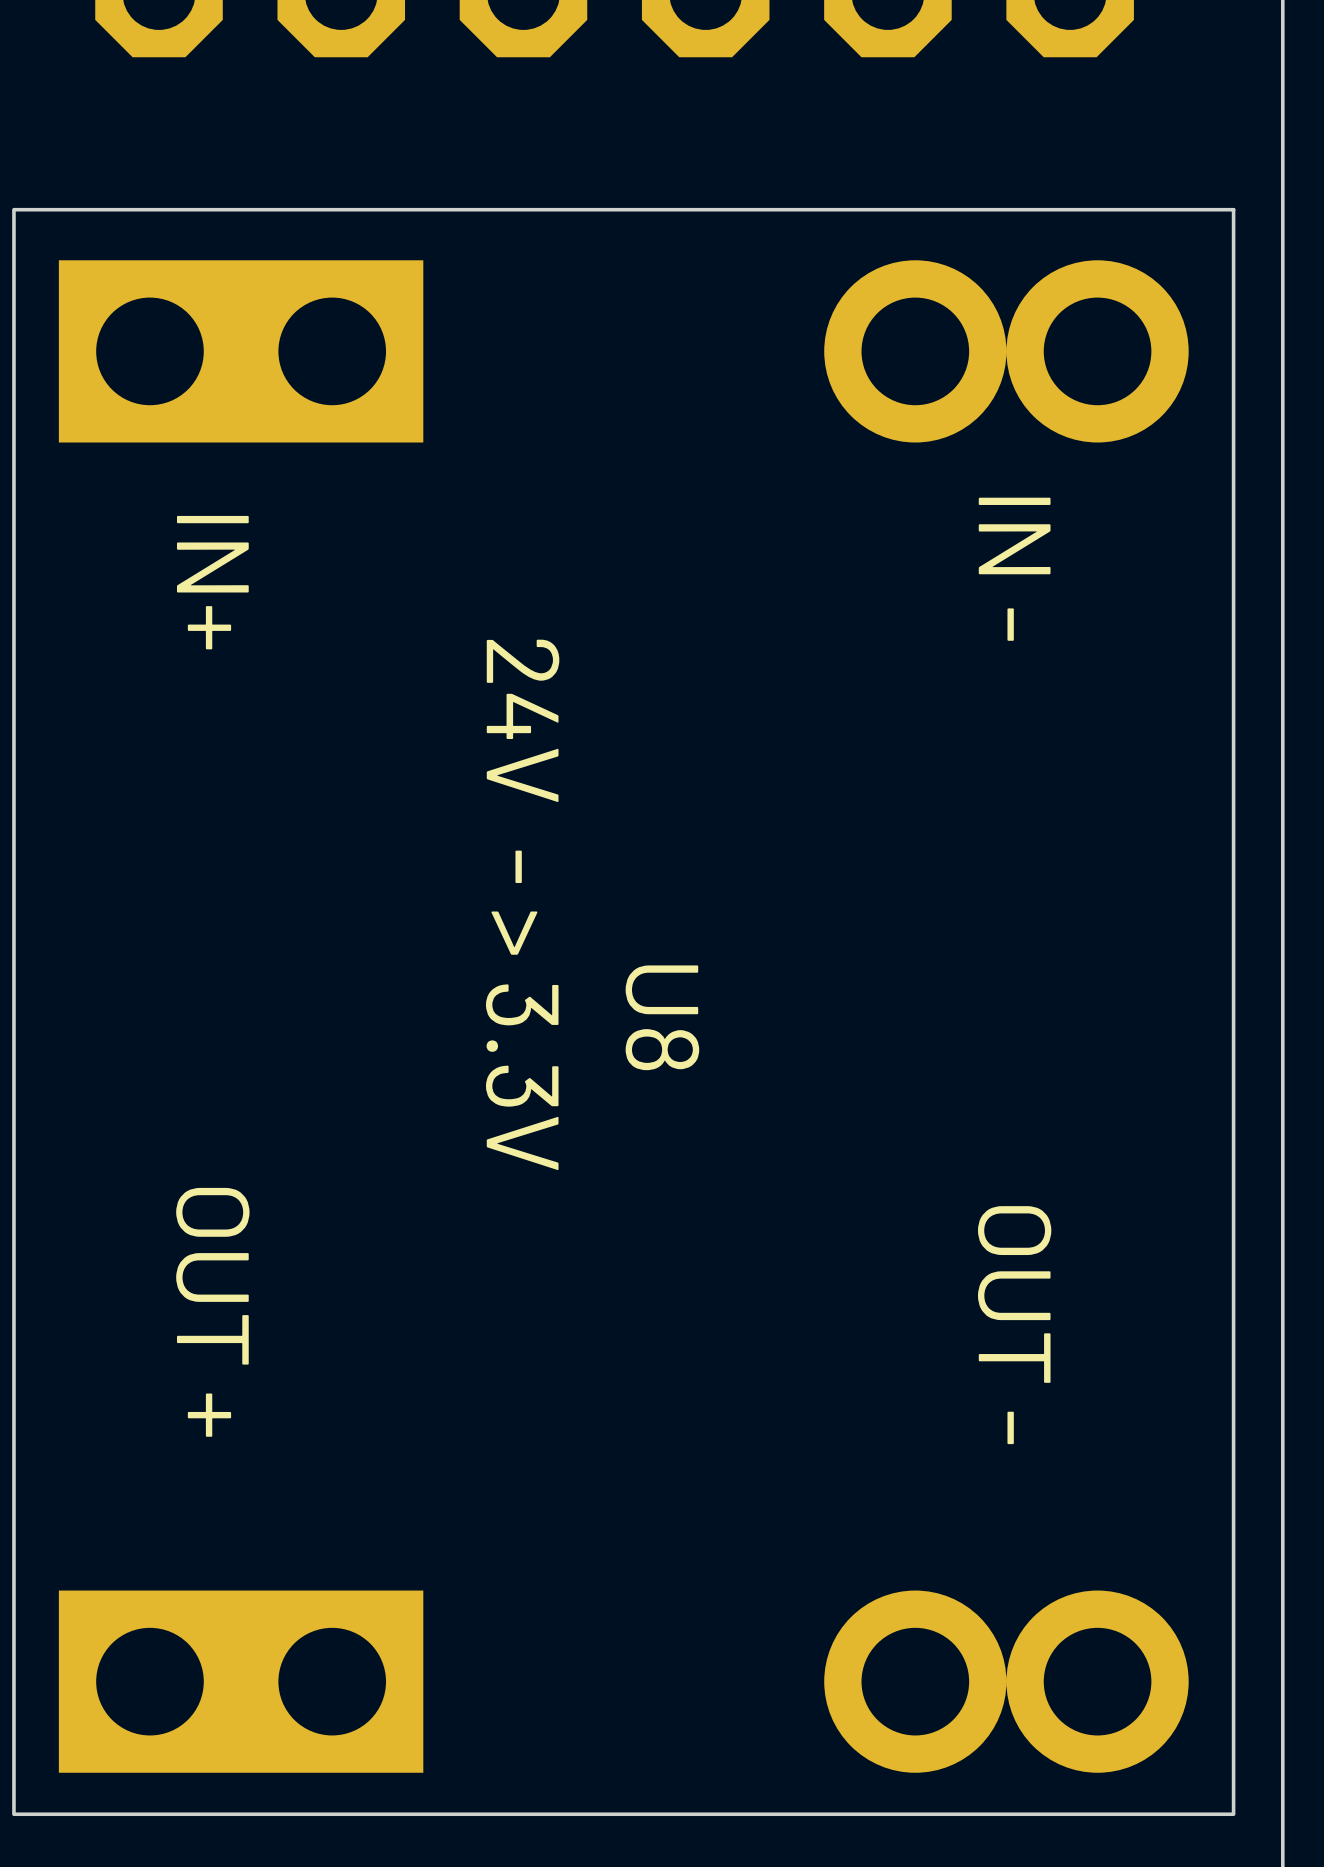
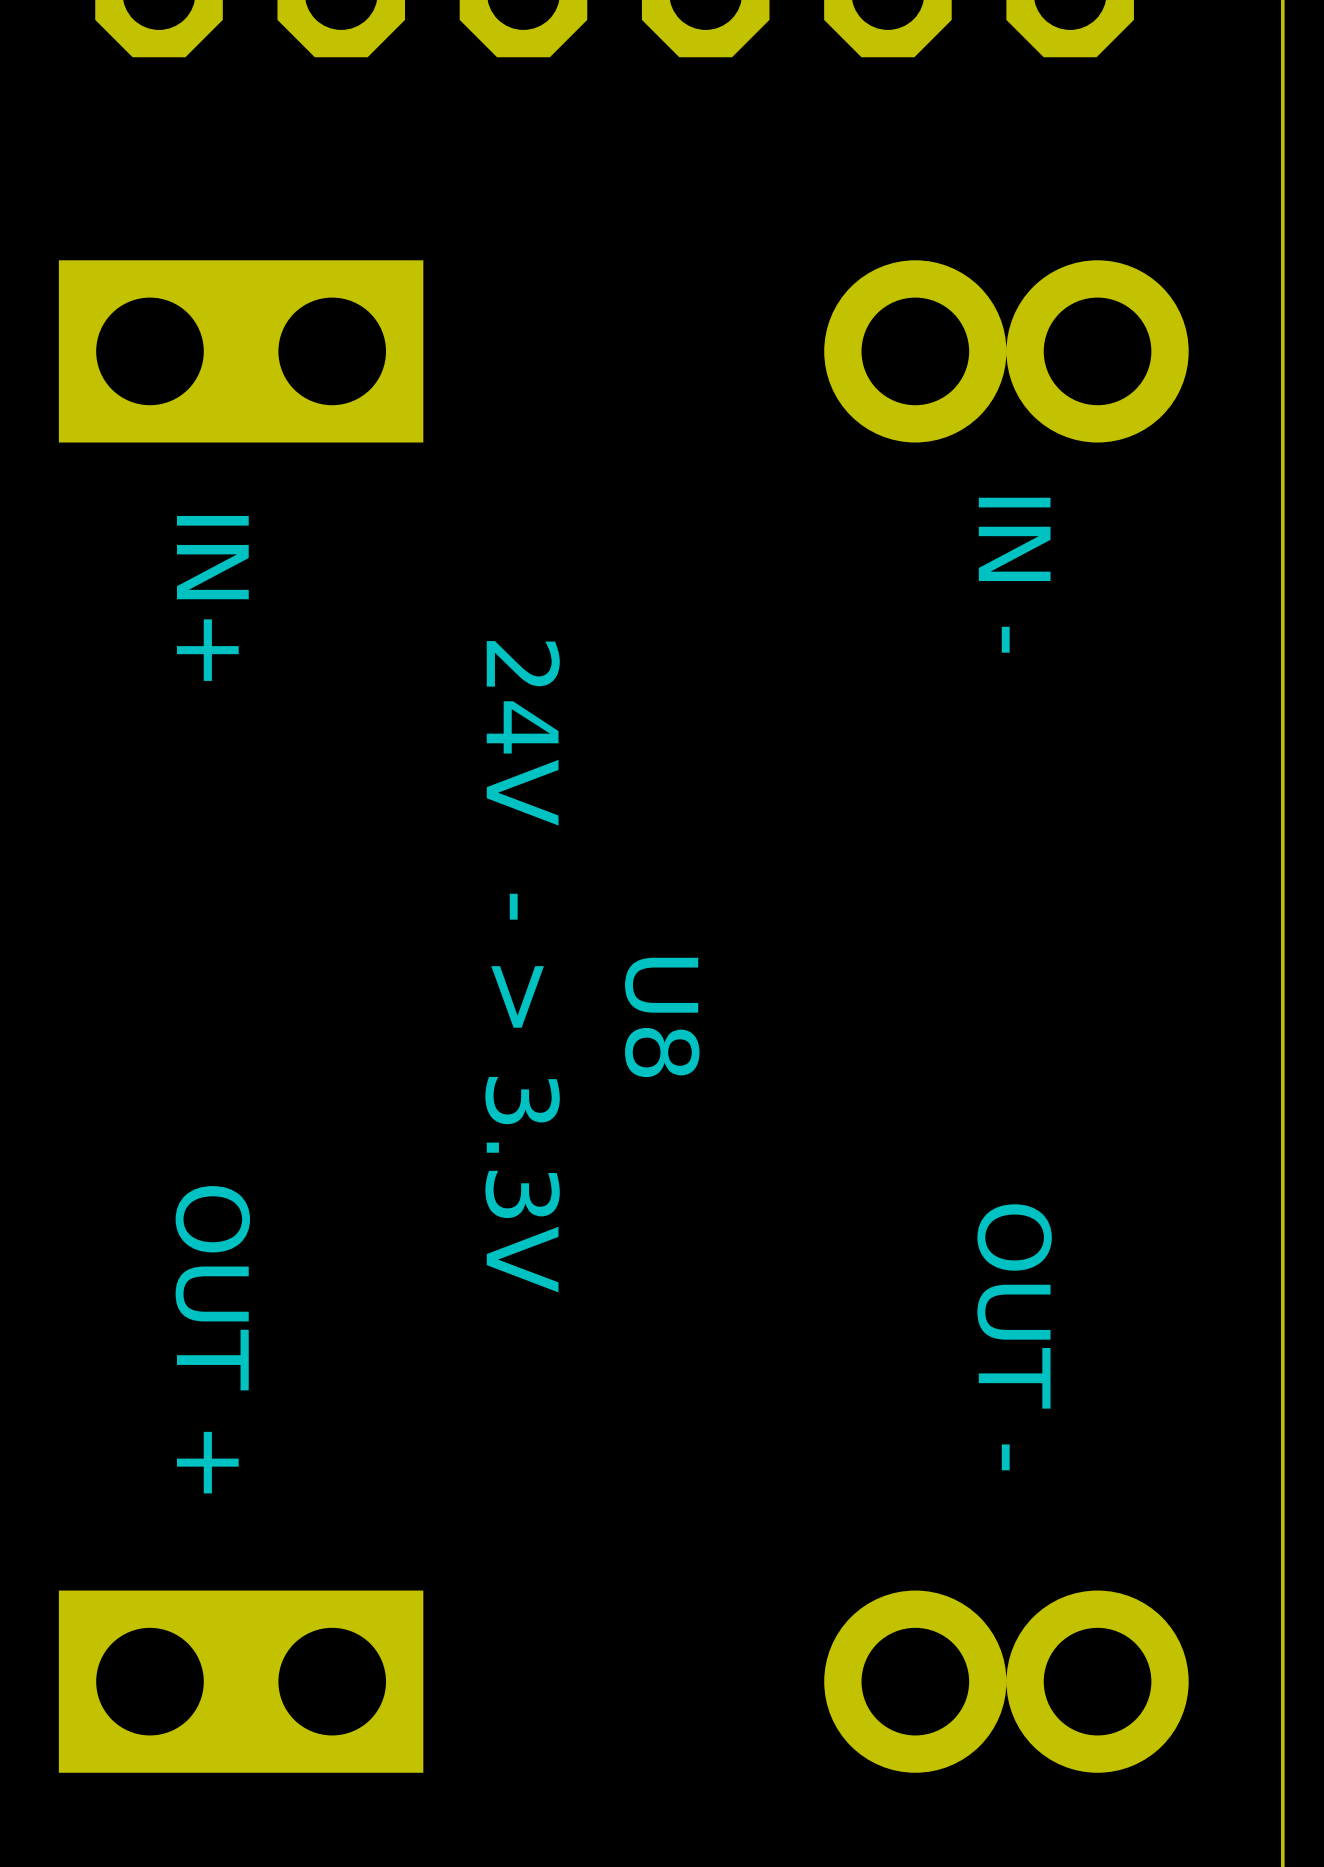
U8 footprint: [12, 207, 1236, 1817] -> [58, 260, 1189, 1773]

